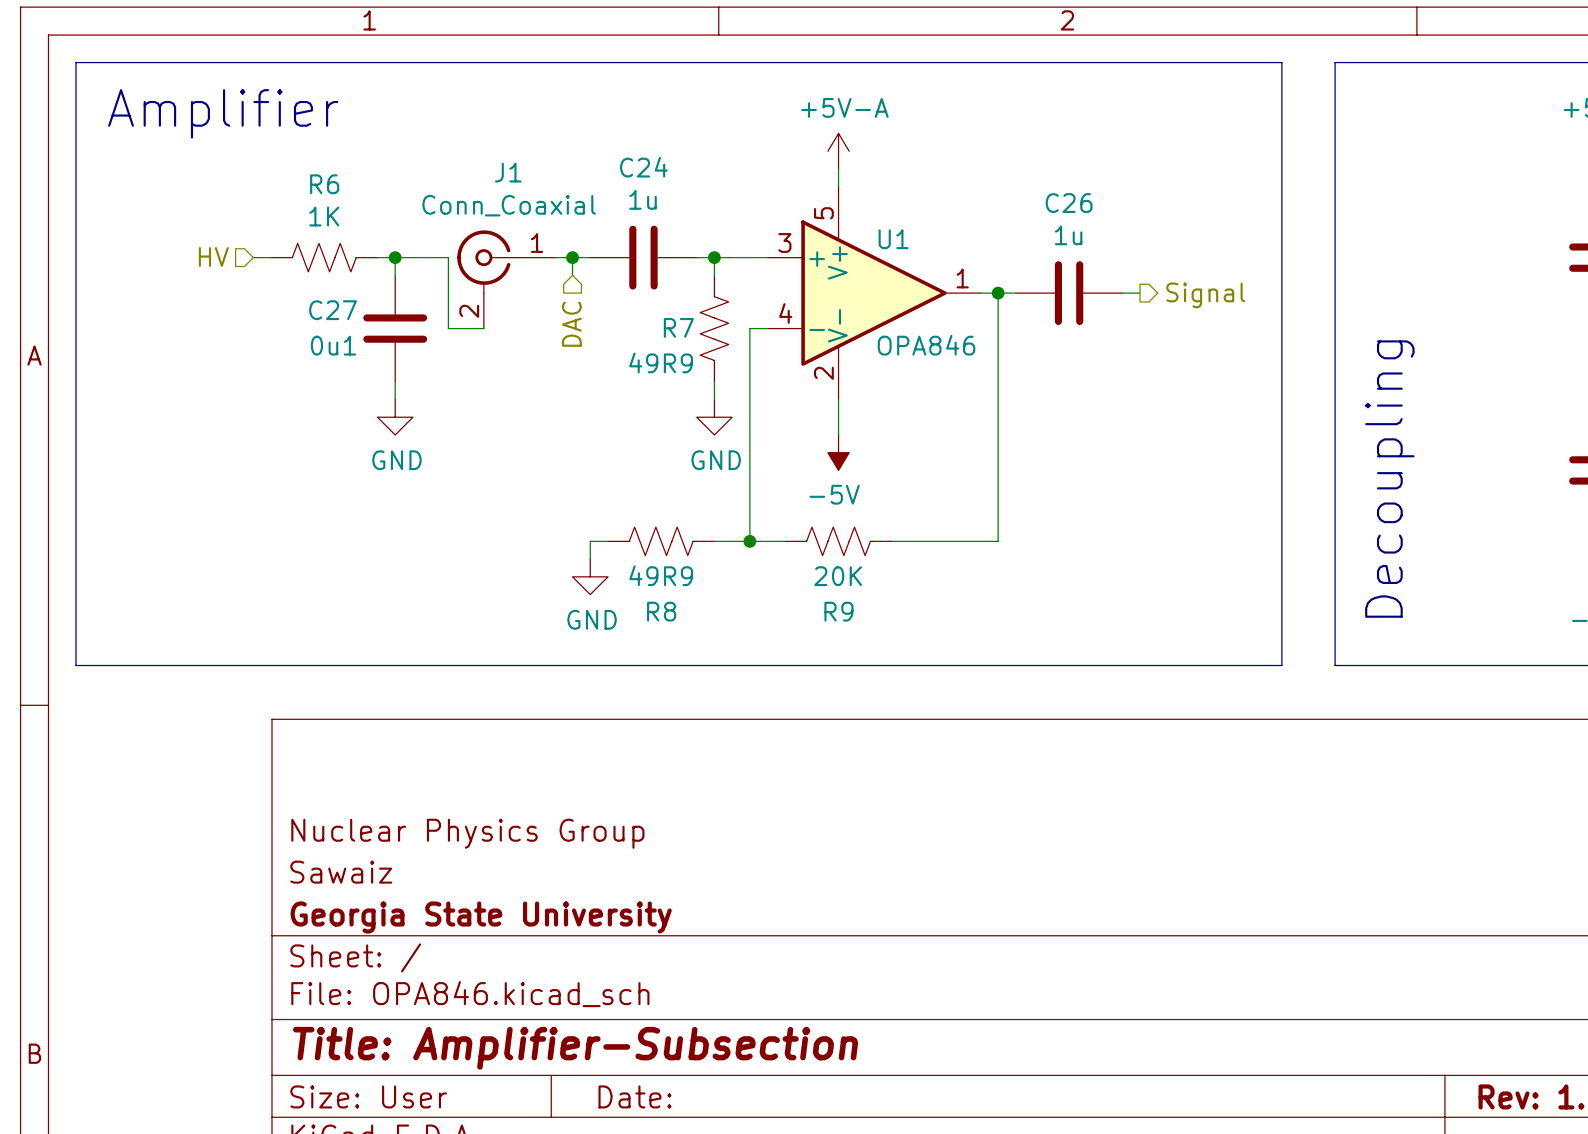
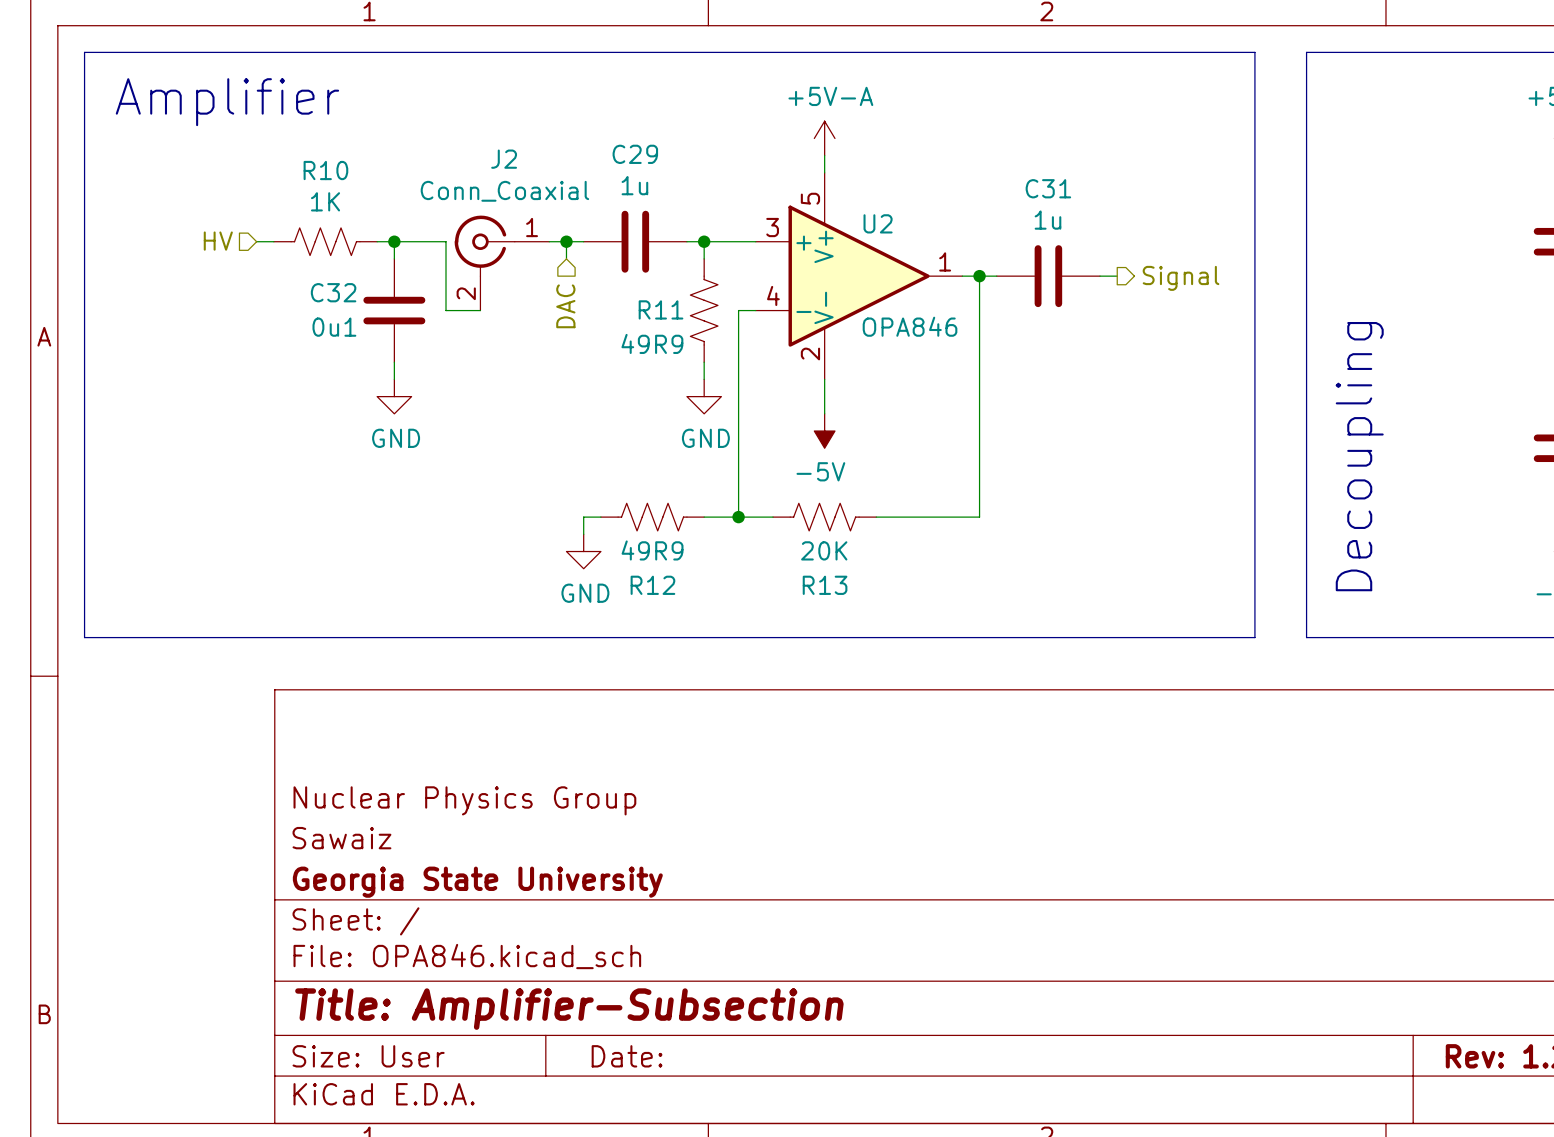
C24 name: C24 (643, 167) -> C29 (635, 154)
R6 name: R6 (324, 184) -> R10 (325, 170)
C26 name: C26 (1069, 203) -> C31 (1048, 188)
U1 name: U1 (893, 239) -> U2 (878, 223)
J1: Conn_Coaxial (506, 279) -> none
J2: none -> Conn_Coaxial (501, 263)
C27 name: C27 (333, 310) -> C32 (333, 292)
R7 name: R7 (678, 327) -> R11 (661, 309)
R8 name: R8 (661, 611) -> R12 (652, 585)
R9 name: R9 (838, 611) -> R13 (825, 585)

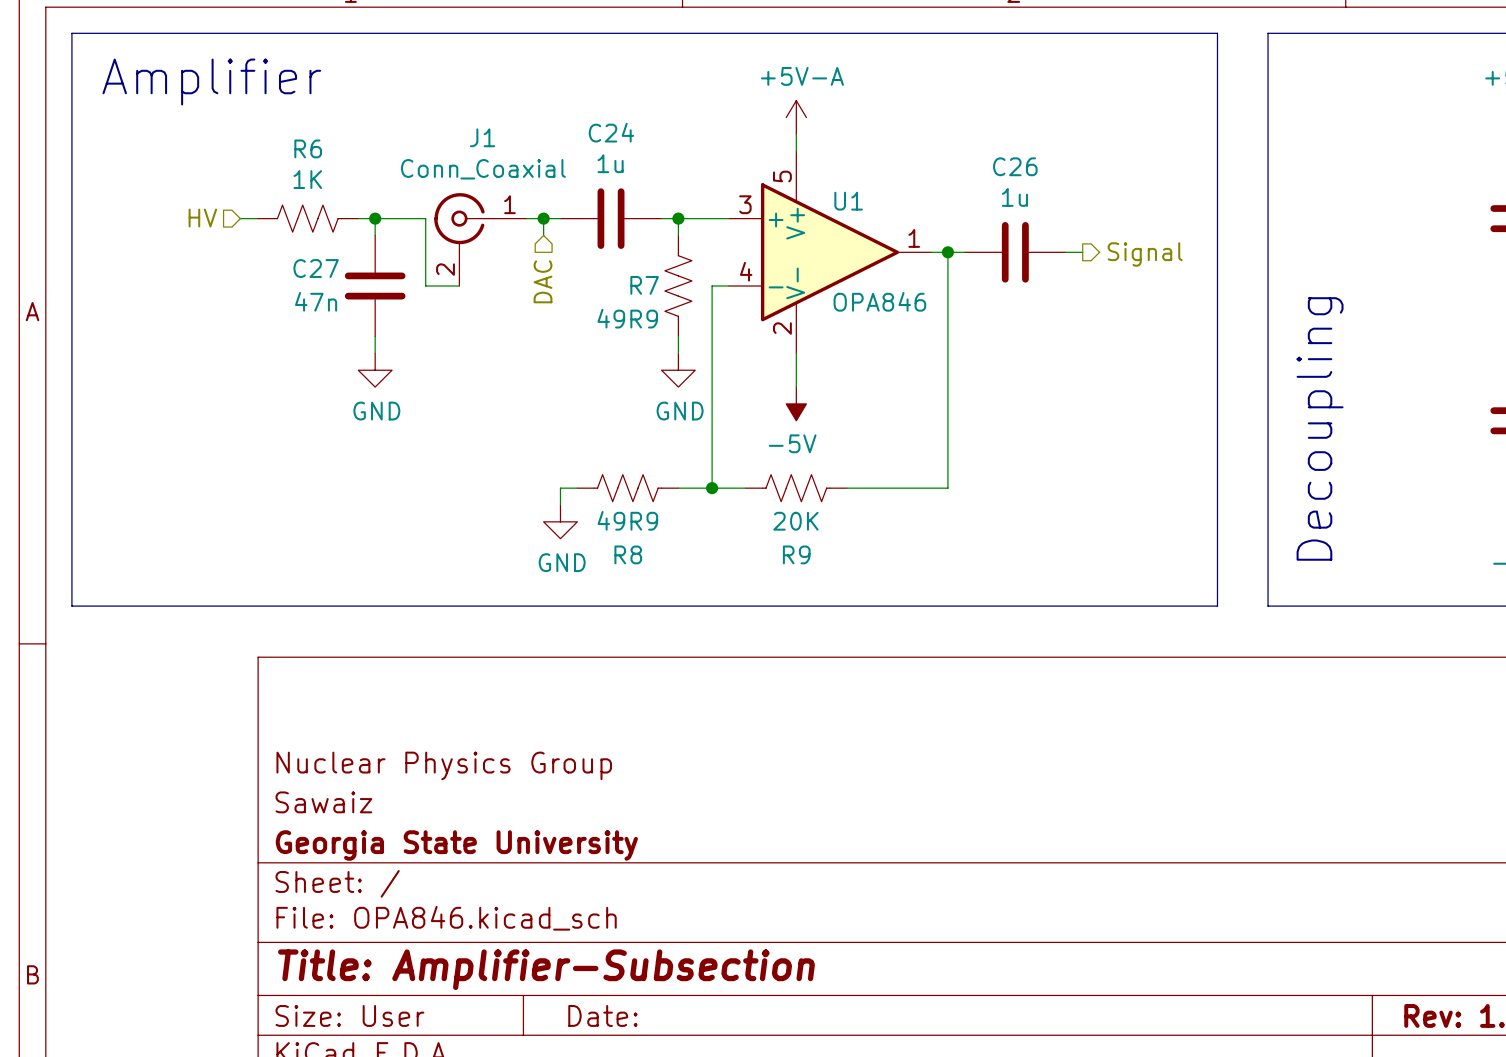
C29 name: C29 (635, 154) -> C24 (611, 132)
J2 name: J2 (504, 159) -> J1 (482, 137)
R10 name: R10 (325, 170) -> R6 (308, 148)
C31 name: C31 (1048, 188) -> C26 (1015, 166)
U2 name: U2 (878, 223) -> U1 (848, 201)
C32 name: C32 (333, 292) -> C27 (316, 268)
R11 name: R11 (661, 309) -> R7 (644, 285)
C32 value: 0u1 (334, 327) -> 47n (316, 301)
R12 name: R12 (652, 585) -> R8 (628, 554)
R13 name: R13 (825, 585) -> R9 (796, 554)

